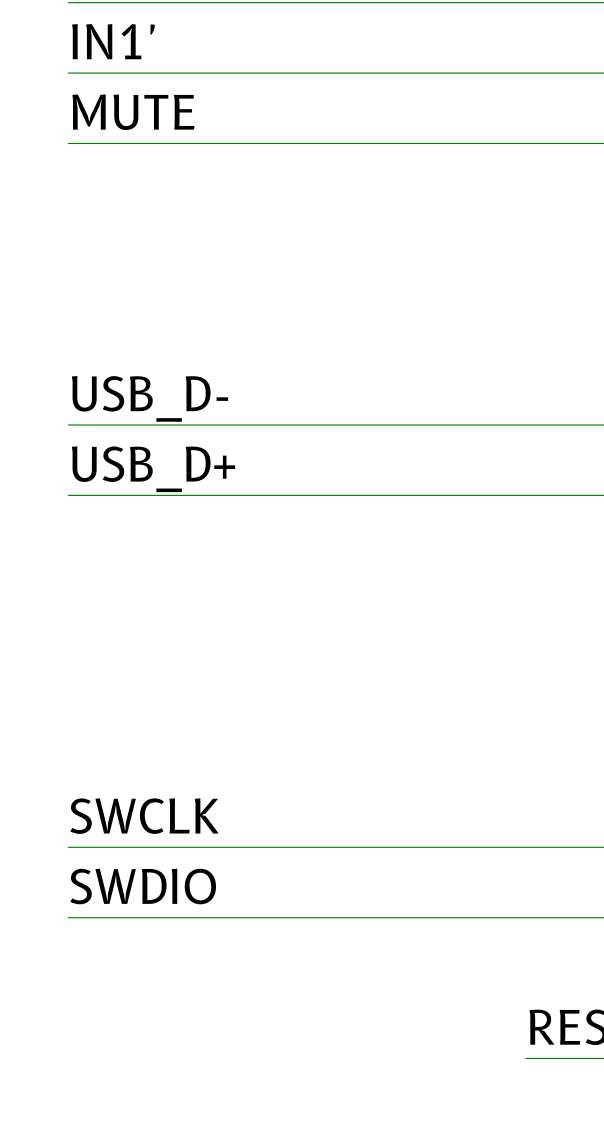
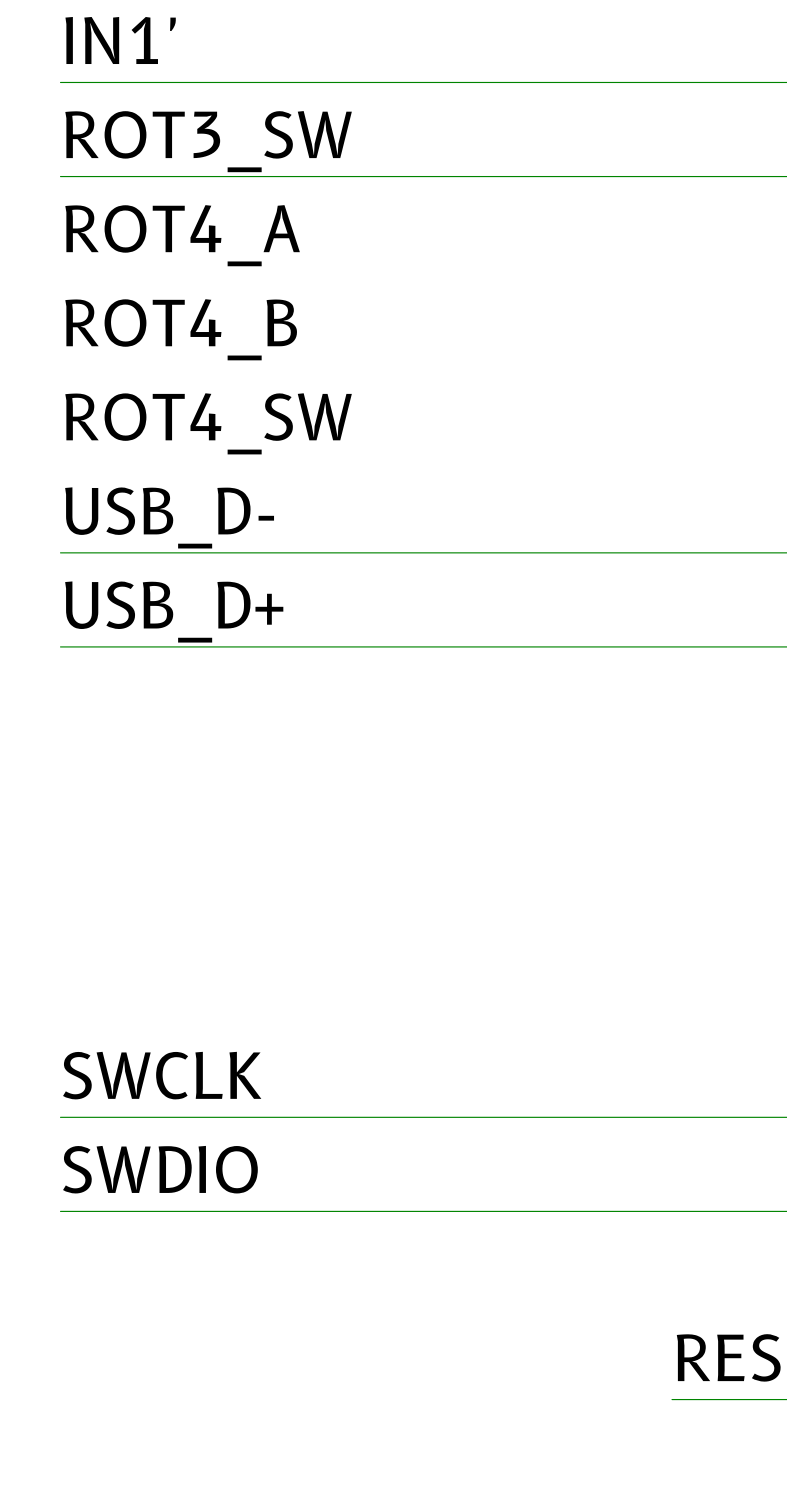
label: MUTE (133, 112) -> ROT3_SW (208, 141)
label: none -> ROT4_A (182, 235)
label: none -> ROT4_B (181, 329)
label: none -> ROT4_SW (208, 423)

